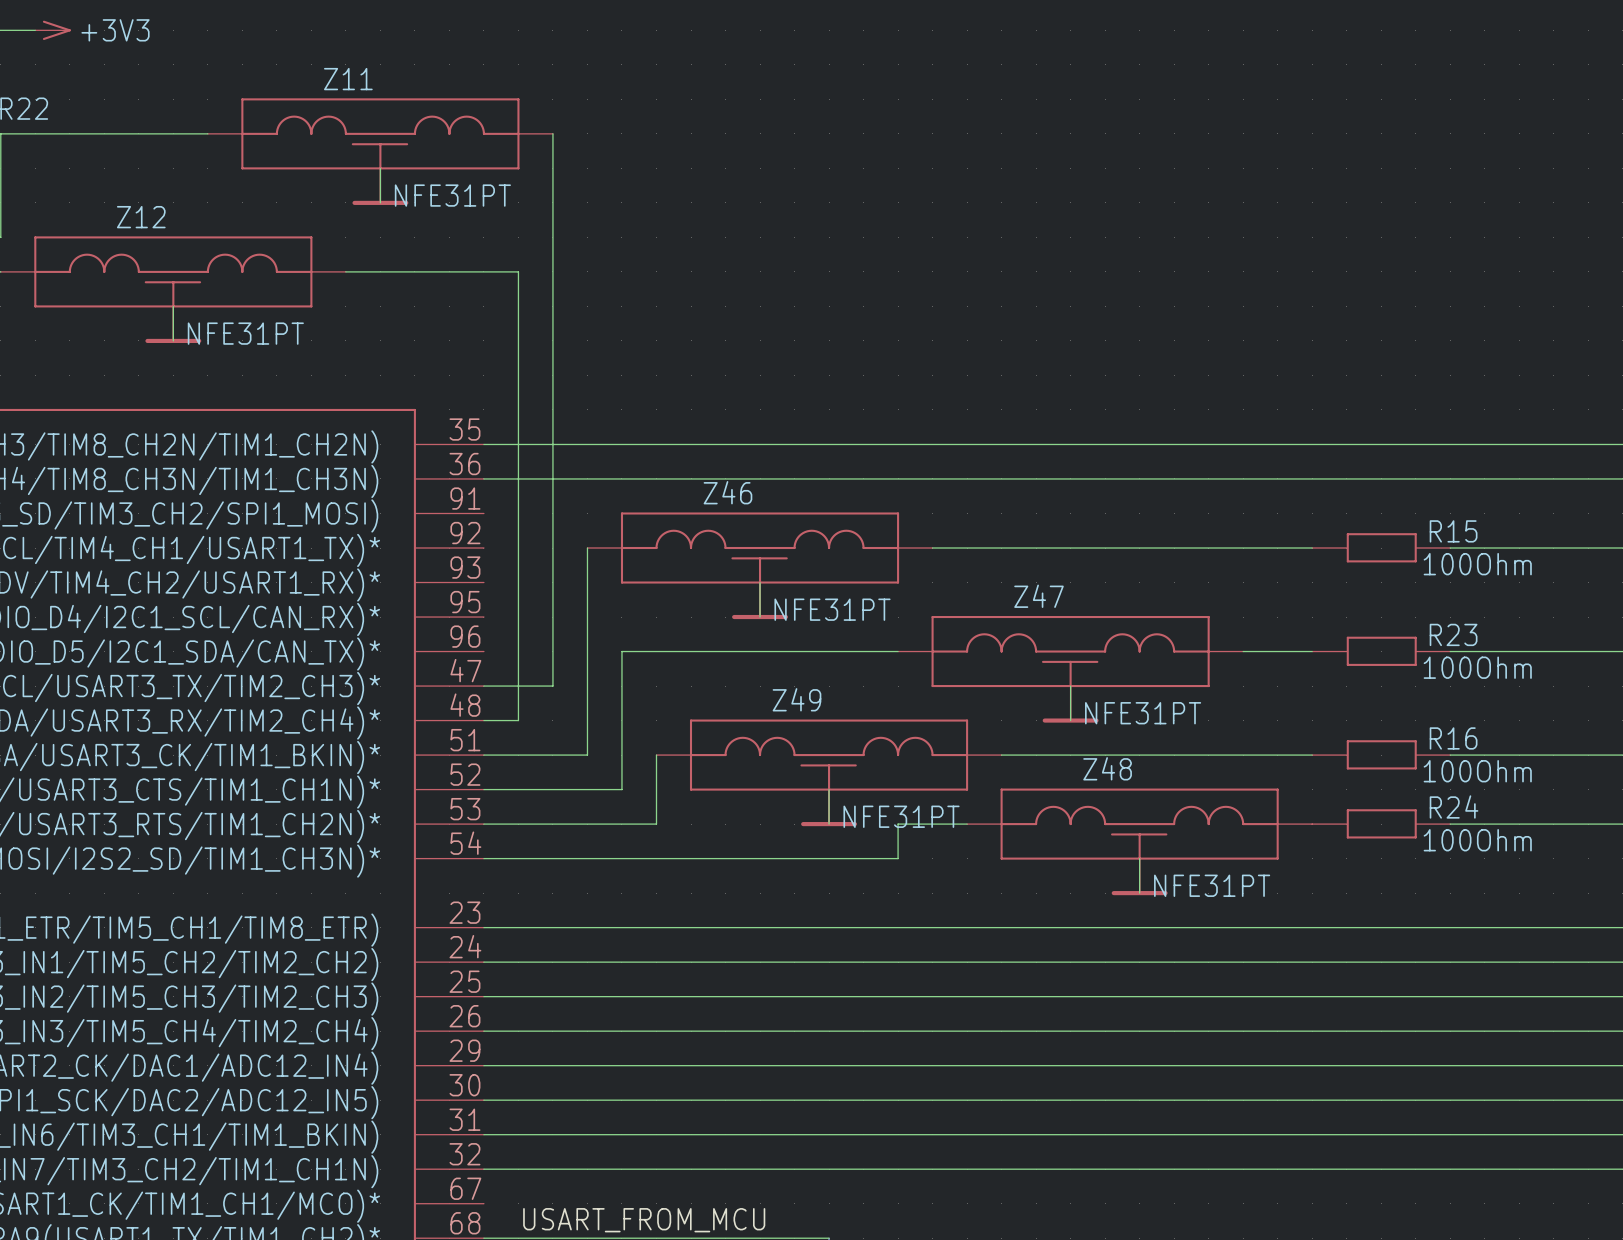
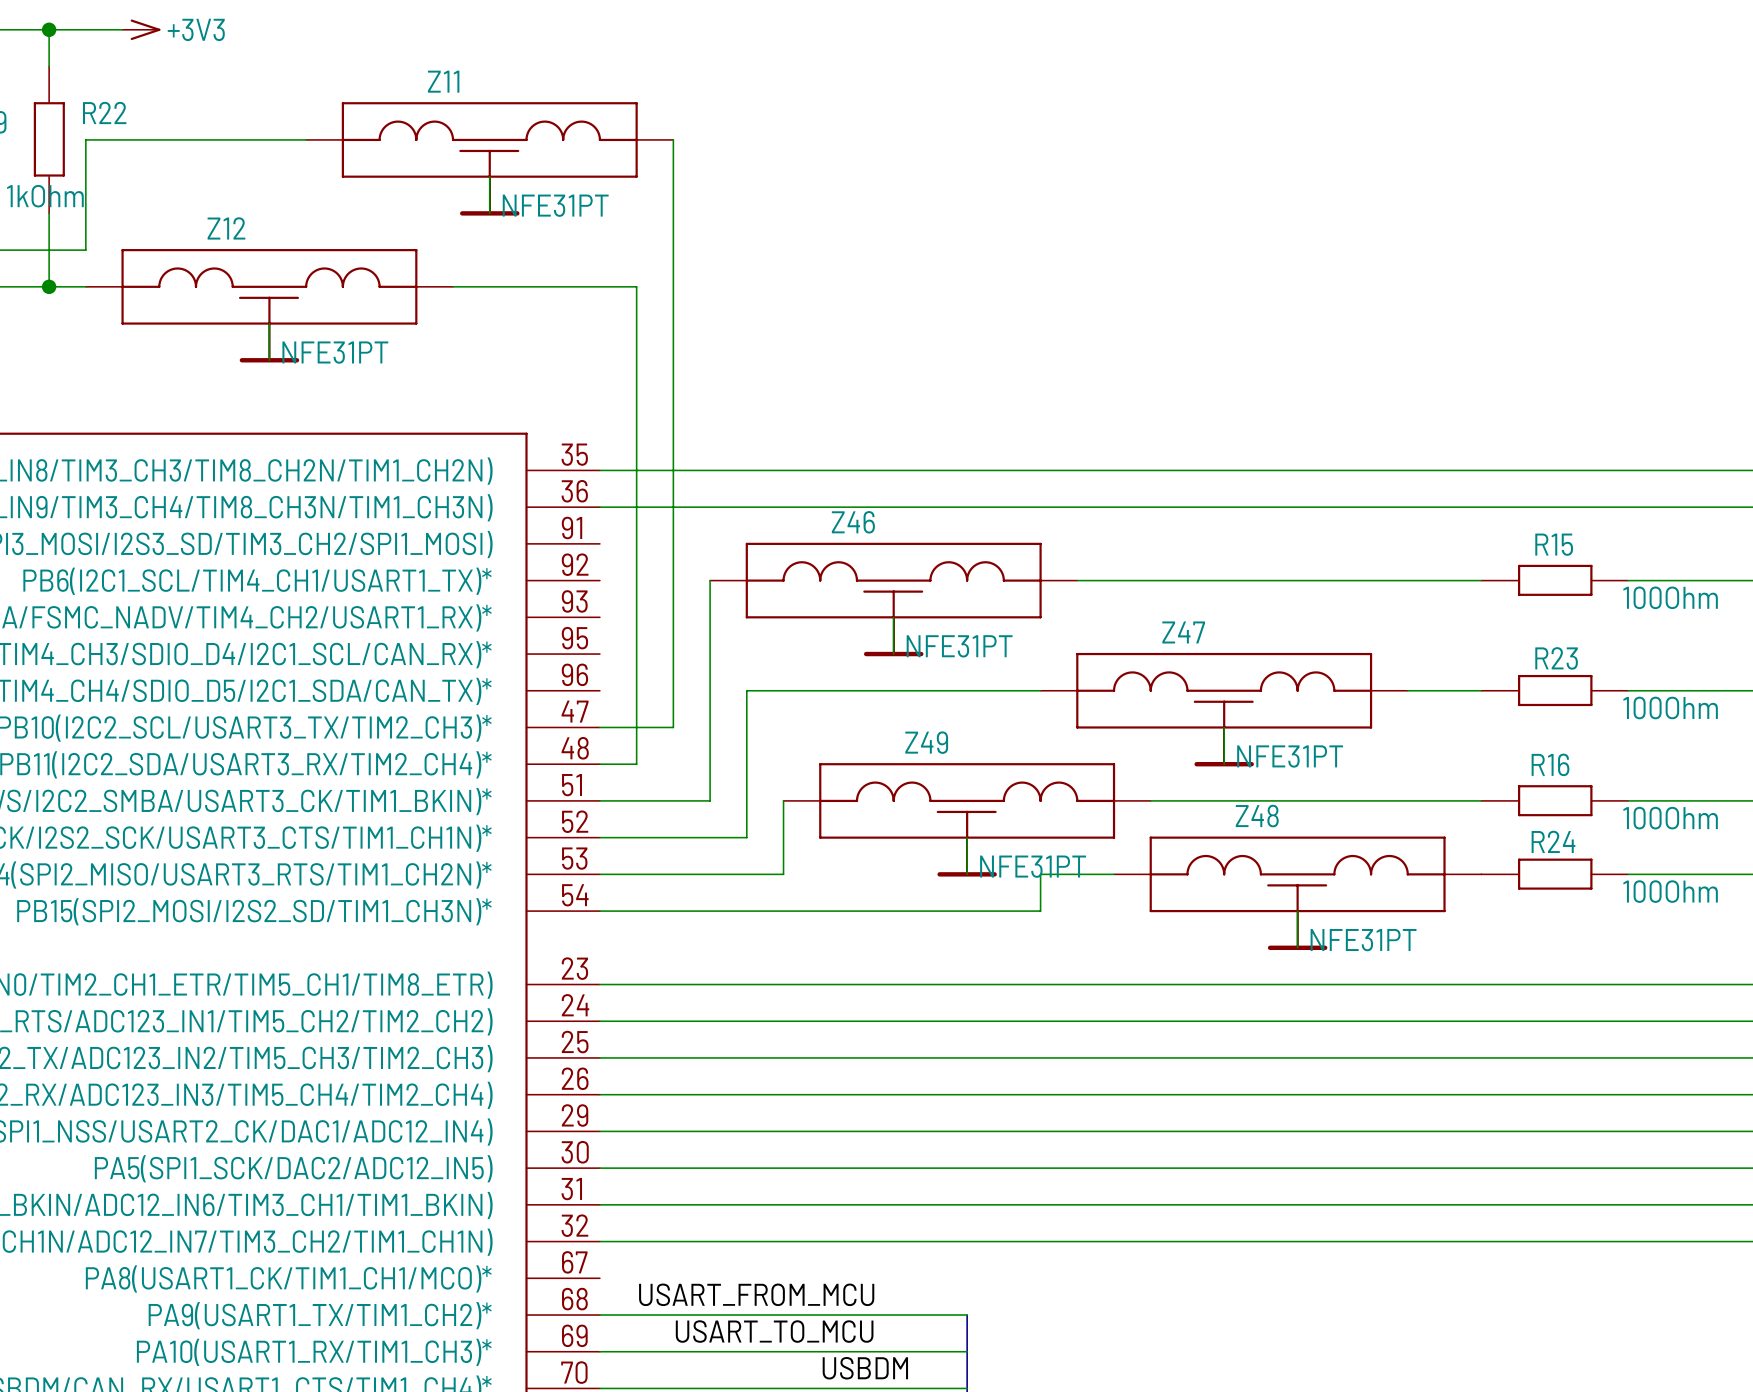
R15 name position: R15 (1453, 531) -> R15 (1554, 544)
R23 name position: R23 (1453, 634) -> R23 (1556, 658)
R16 name position: R16 (1453, 738) -> R16 (1550, 764)
R24 name position: R24 (1454, 806) -> R24 (1553, 841)

